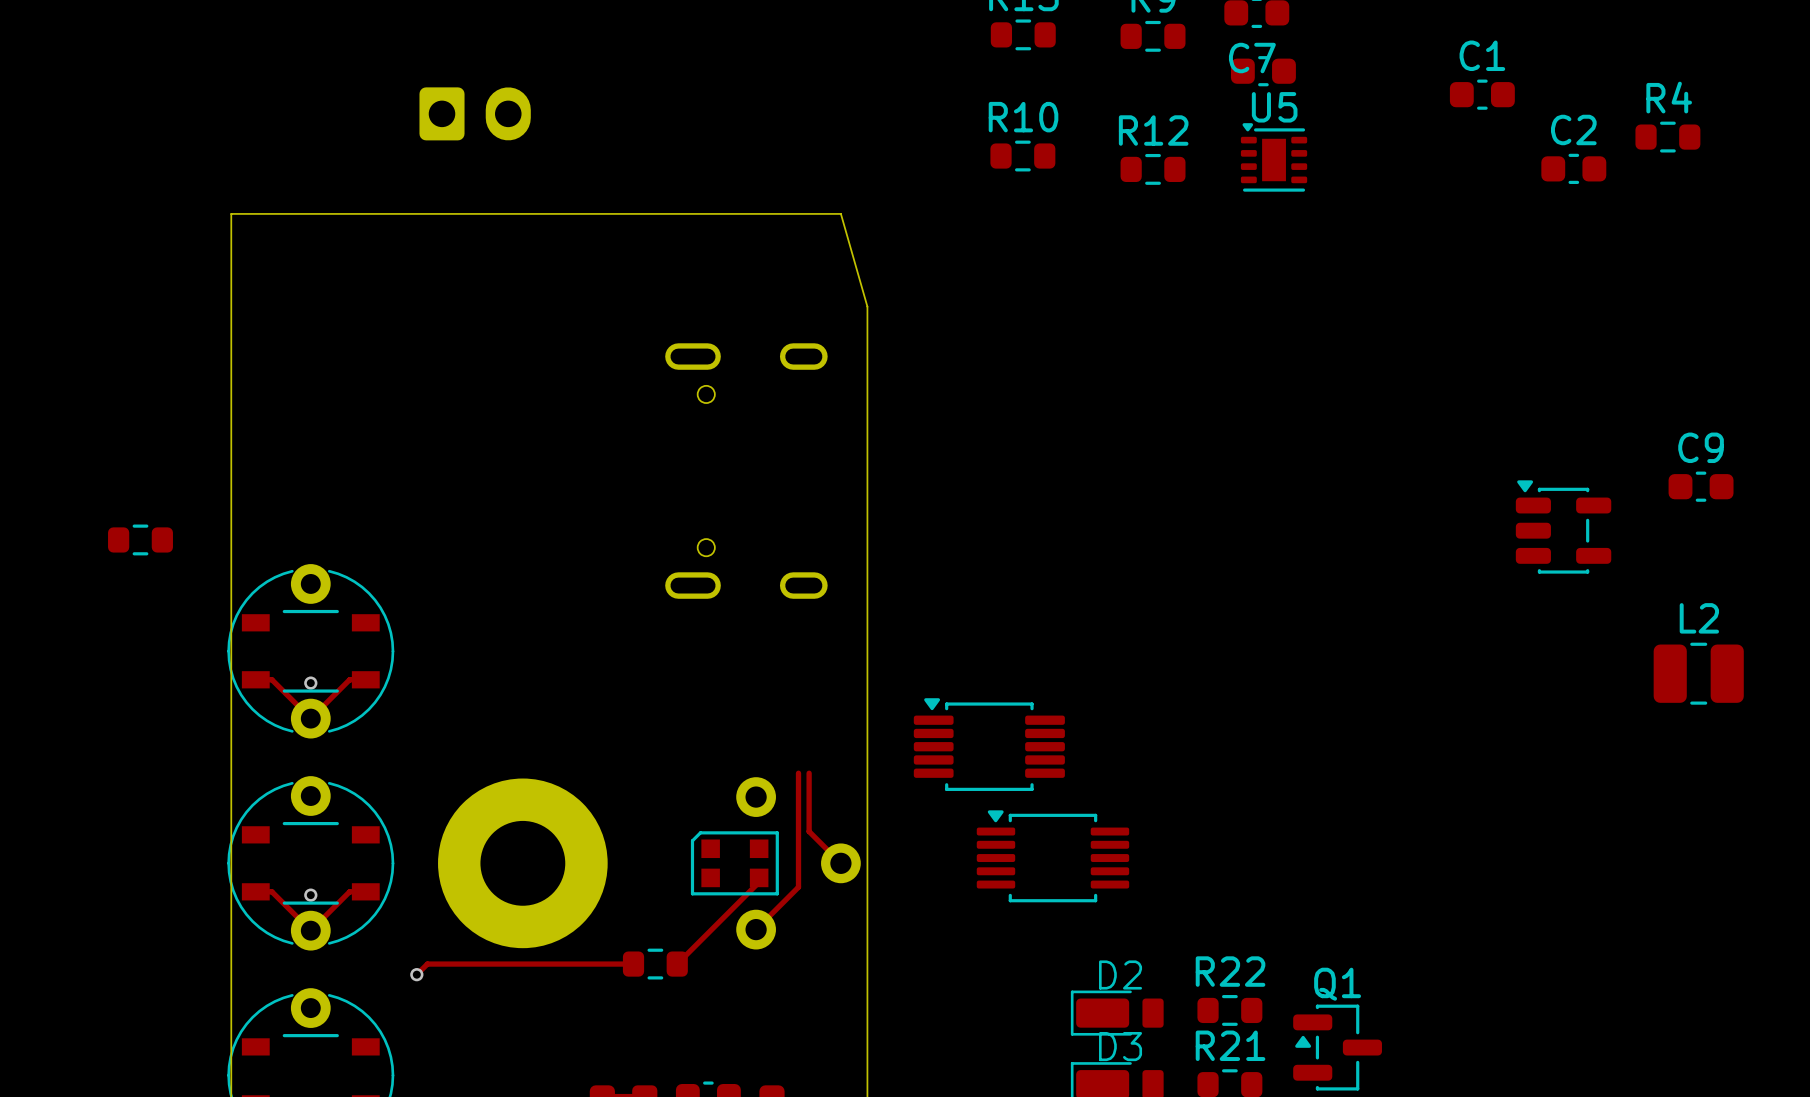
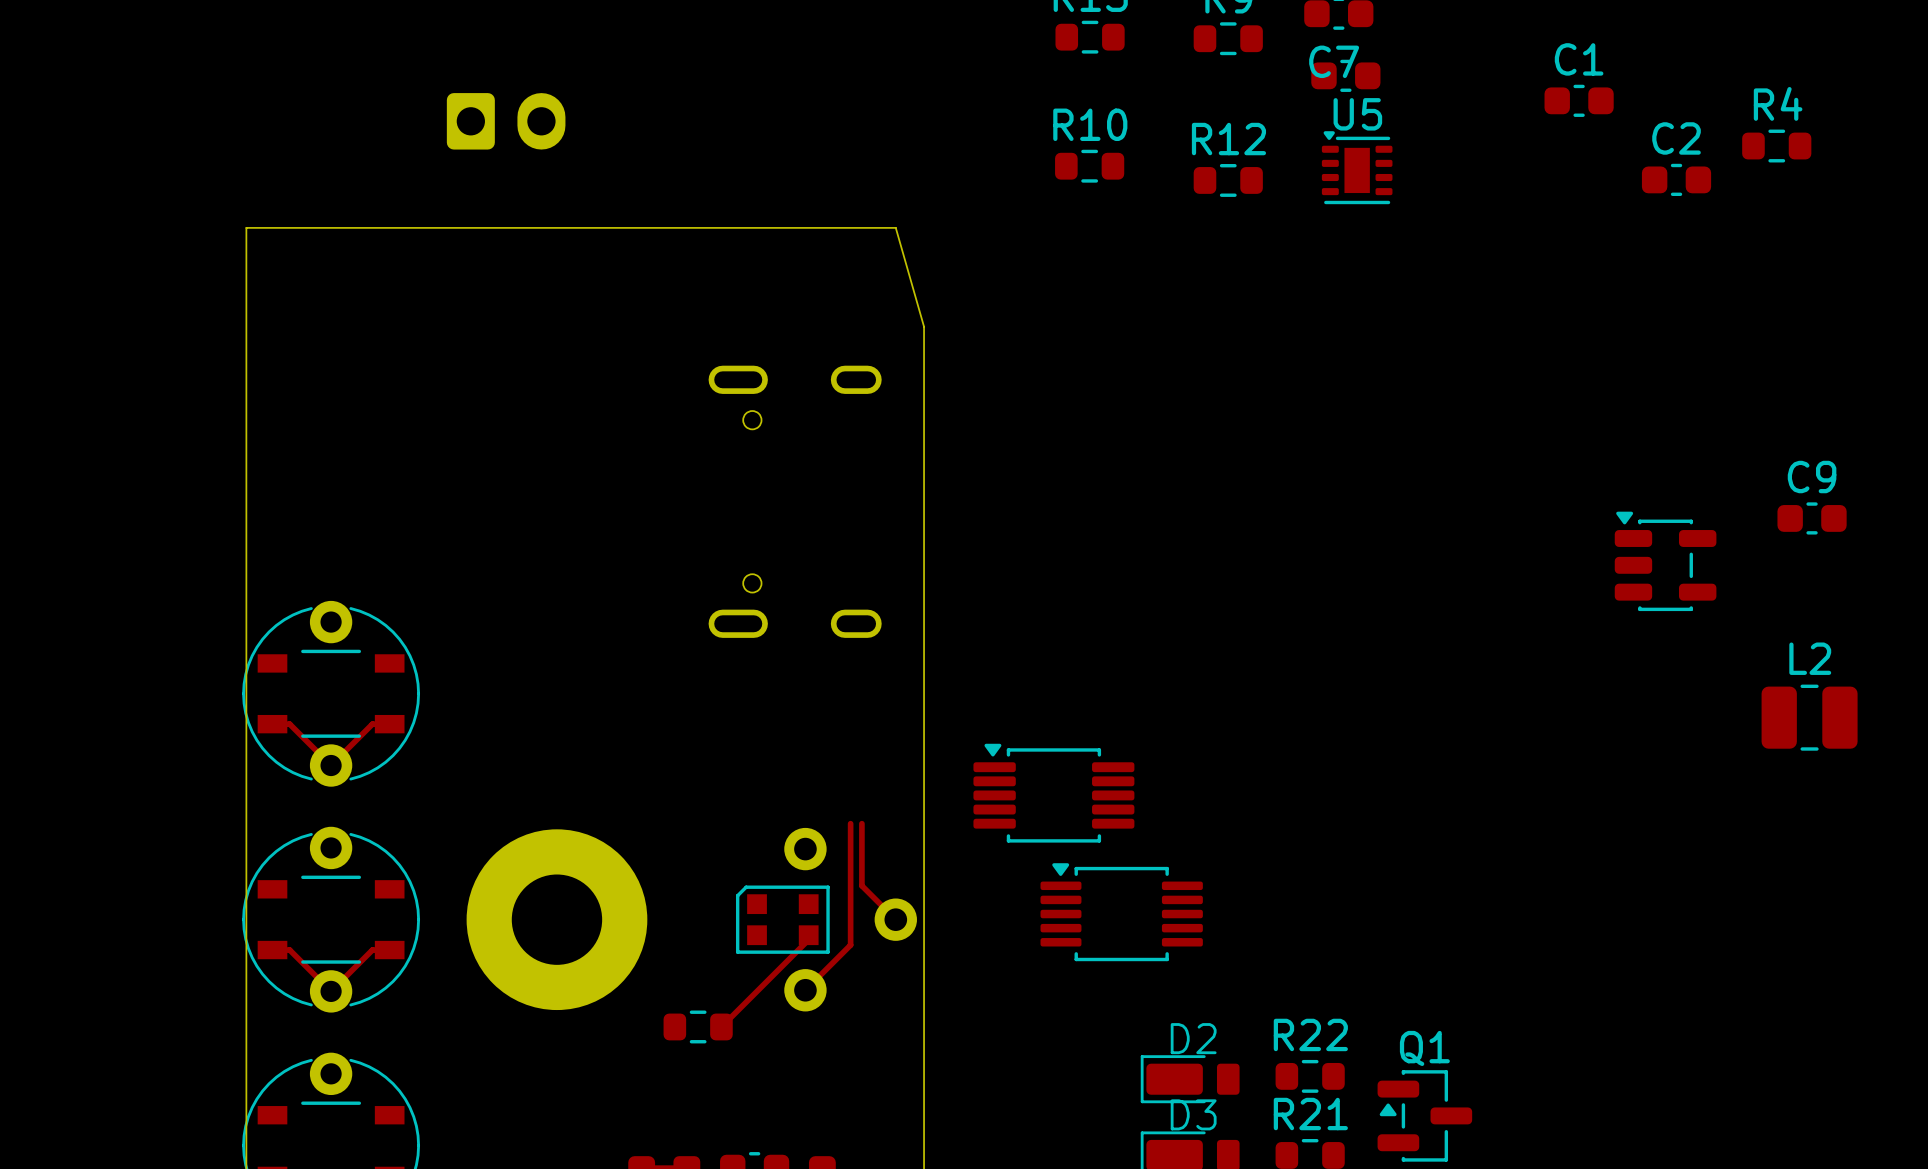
part: (140, 539) -> none
via: (310, 683) -> none
via: (310, 895) -> none
track: (633, 964) (427, 964) (416, 974) -> none
via: (416, 974) -> none

